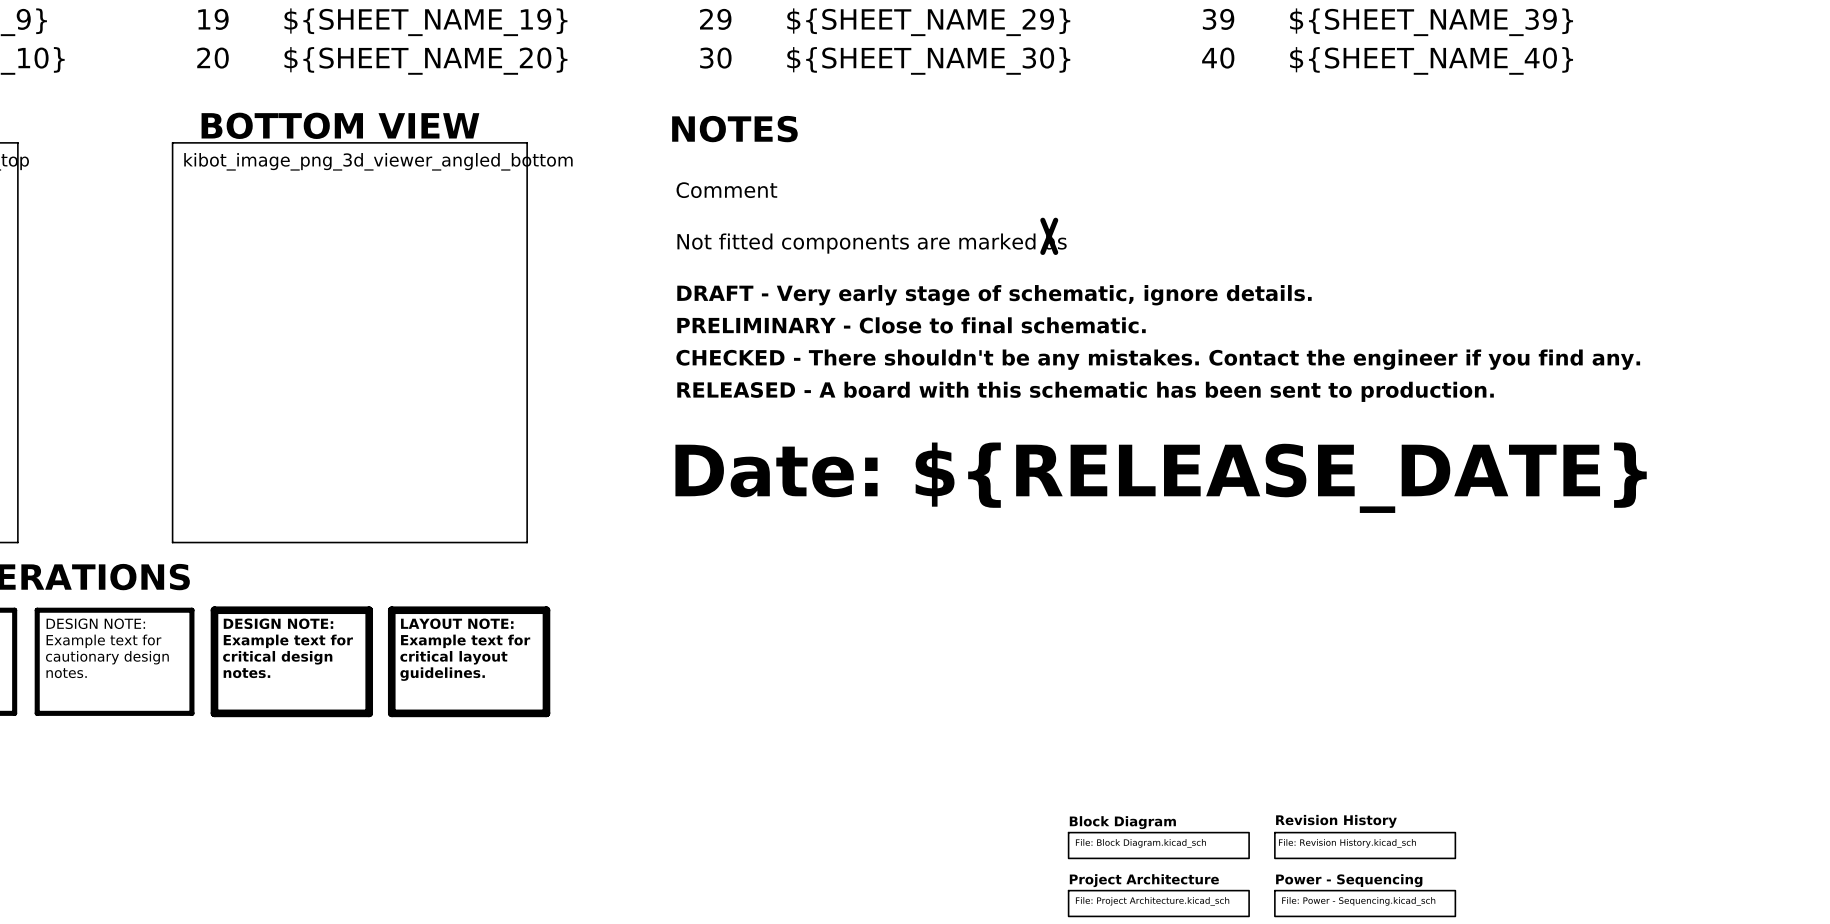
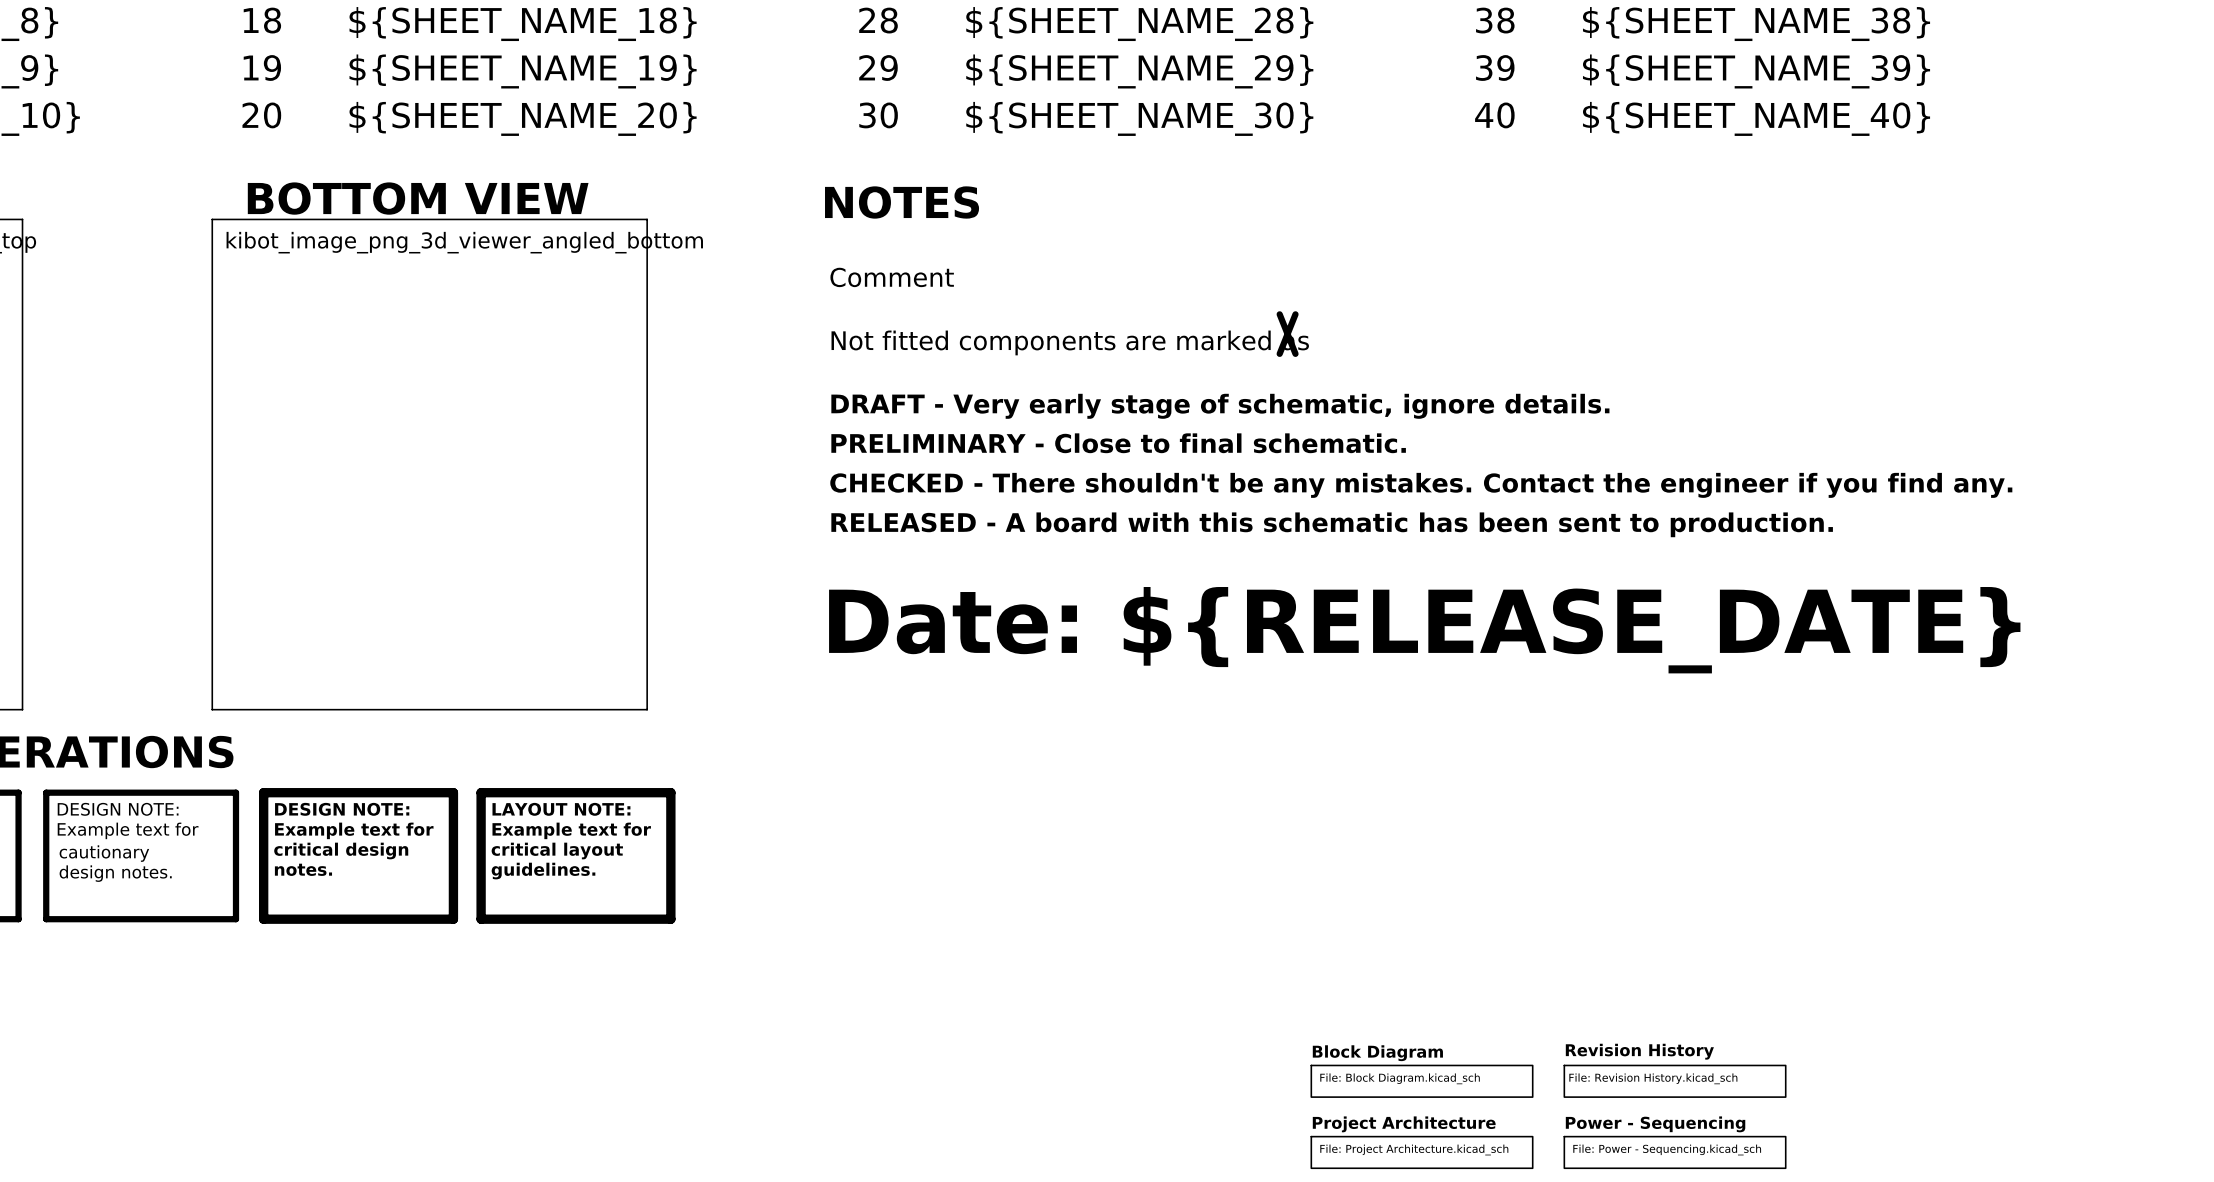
text: cautionary design (107, 657) -> cautionary (104, 853)
text: notes. (66, 673) -> design notes. (115, 873)

